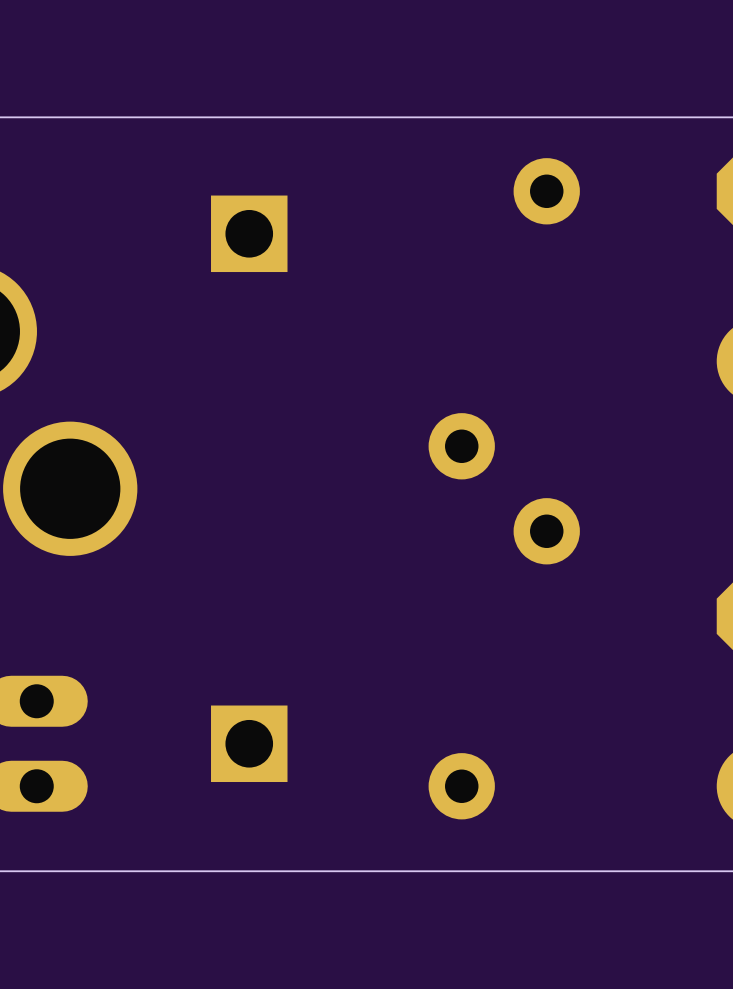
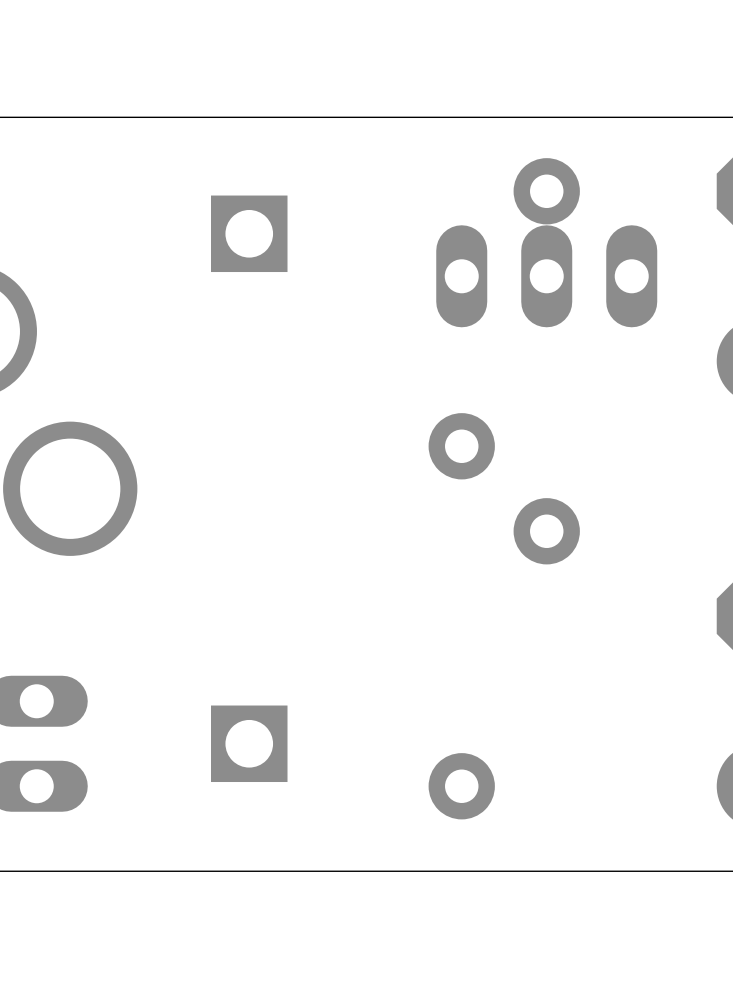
part: none -> (546, 276)

